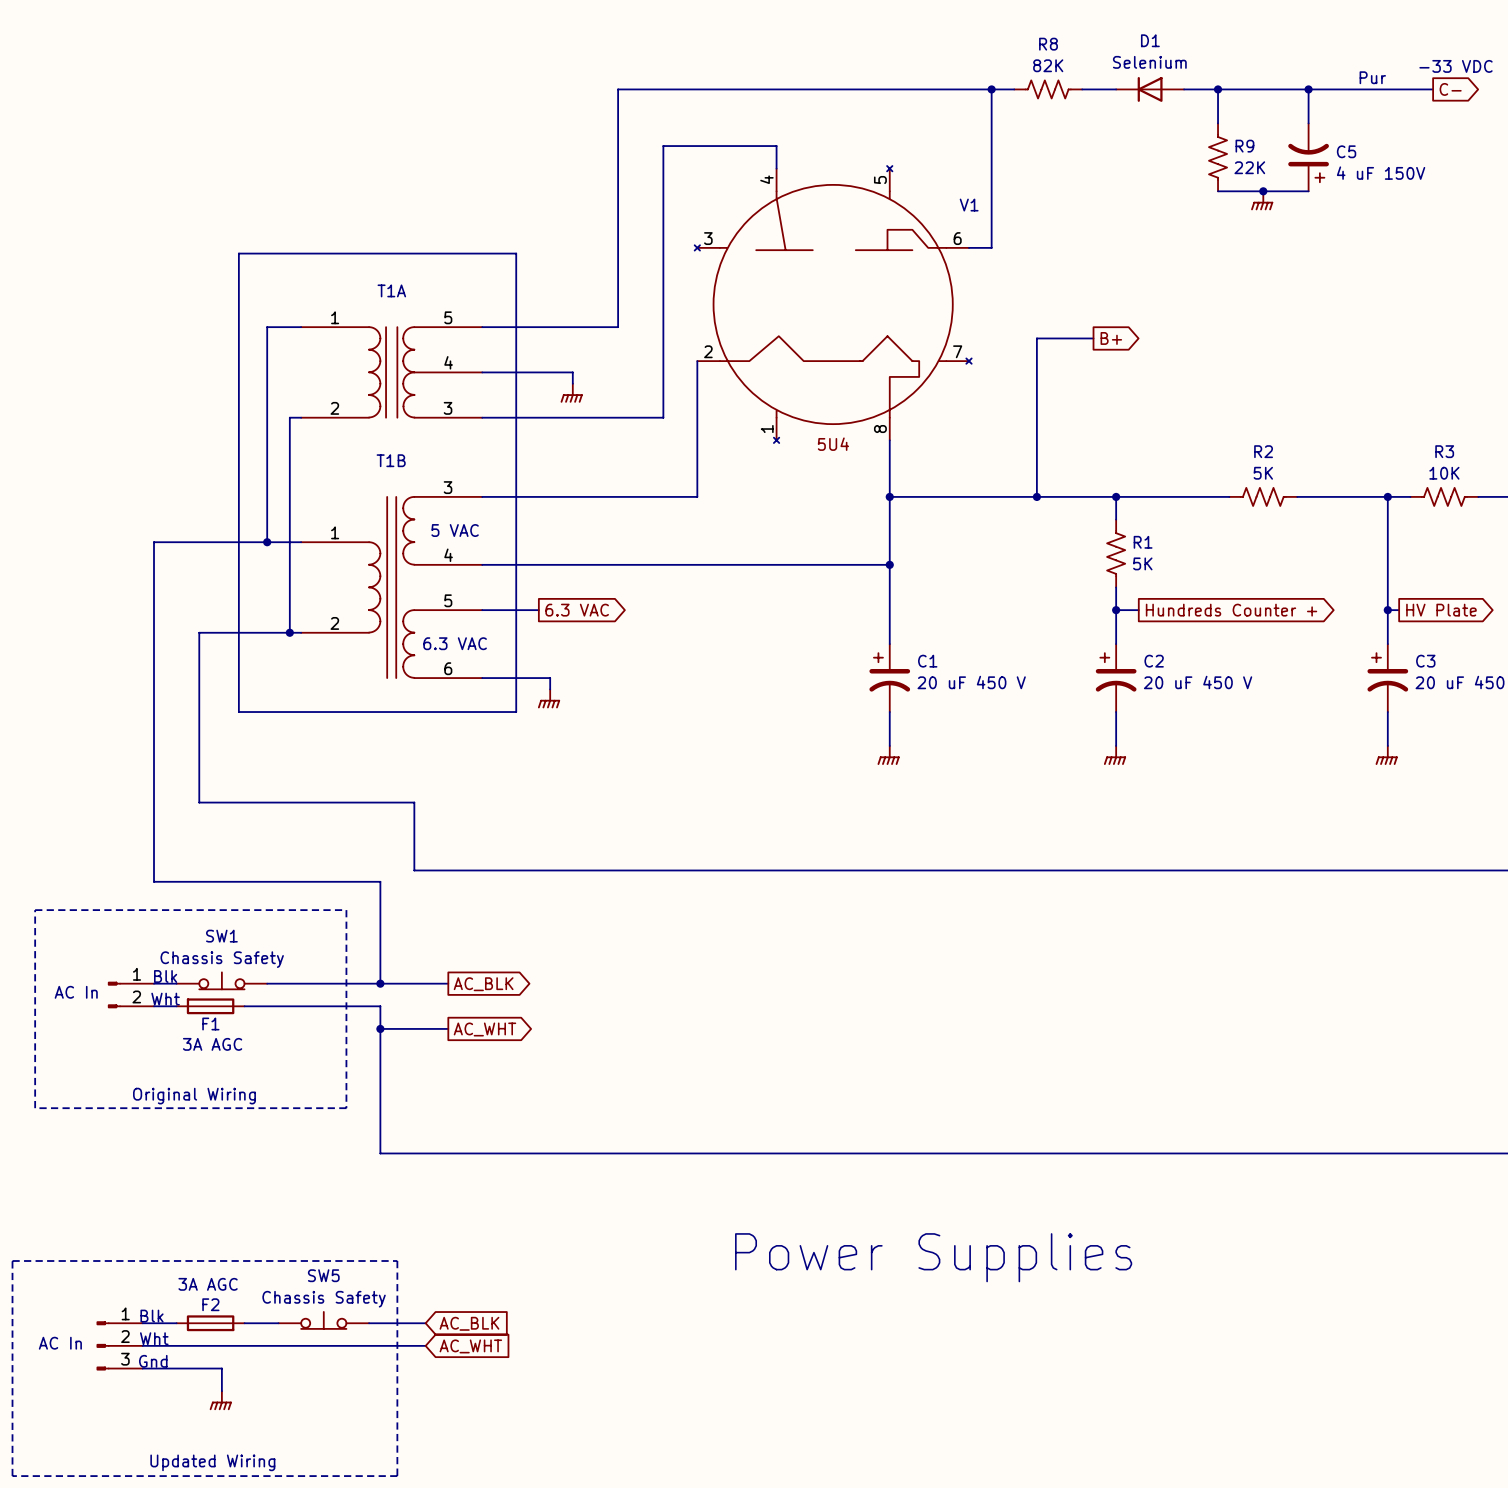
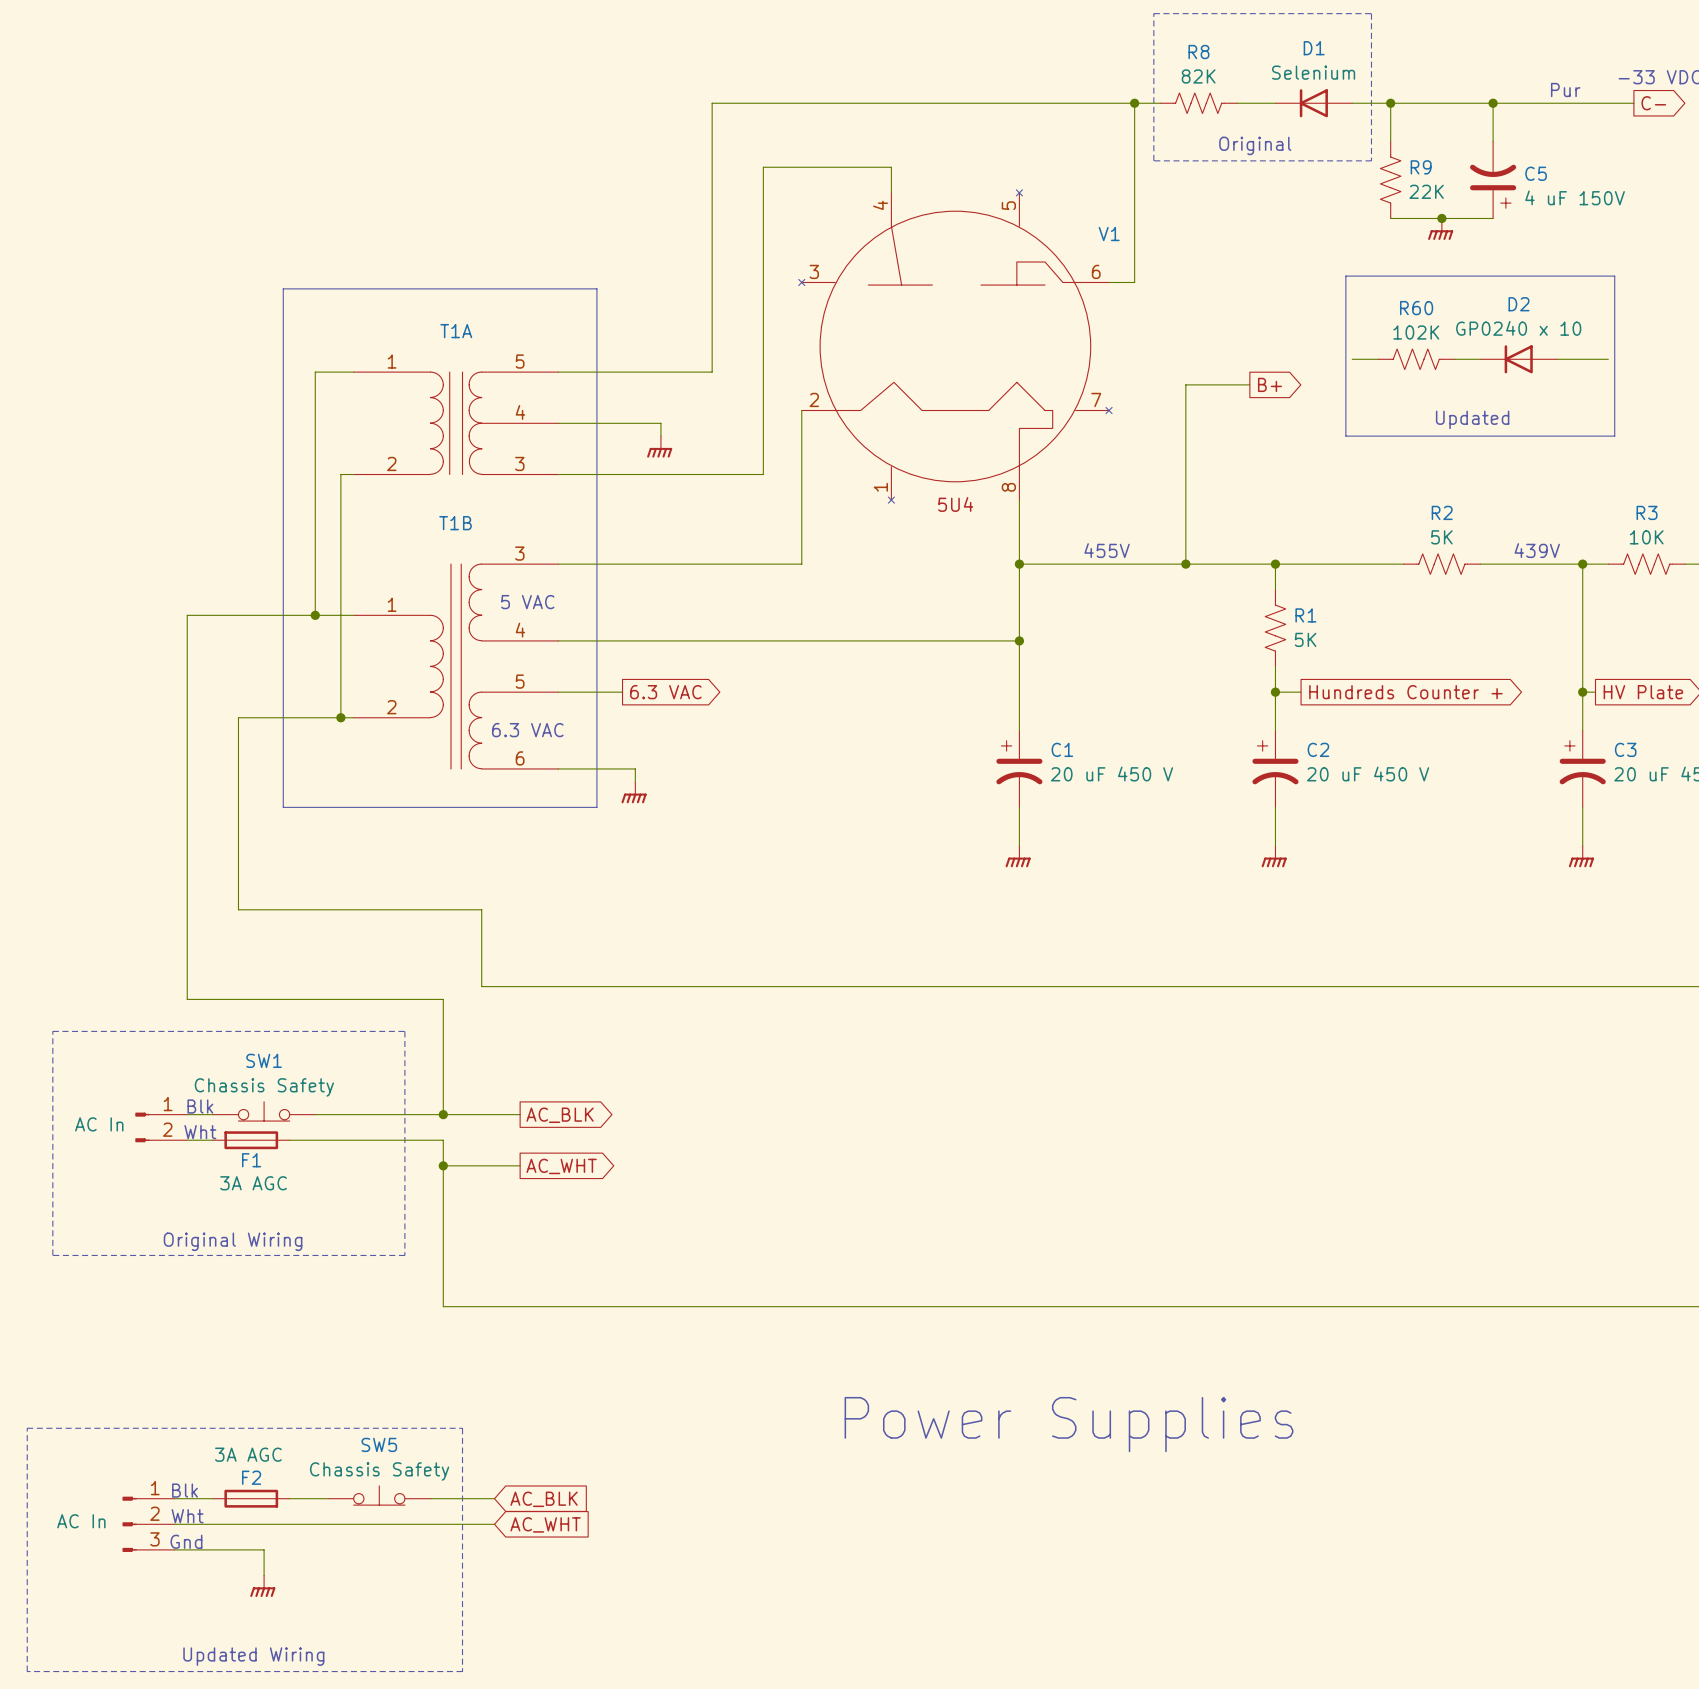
line: none -> (1153, 13) (1371, 13) (1371, 160) (1153, 160) (1153, 13)
text: none -> Original (1255, 145)
line: none -> (1345, 276) (1614, 276) (1614, 436) (1345, 436) (1345, 276)
wire: none -> (1352, 359) (1377, 359)
R60: none -> 102K (1416, 359)
wire: none -> (1454, 359) (1480, 359)
D2: none -> GP0240 x 10 (1518, 359)
wire: none -> (1557, 359) (1608, 359)
text: none -> Updated (1472, 419)
text: none -> 455V (1107, 550)
text: none -> 439V (1537, 550)

